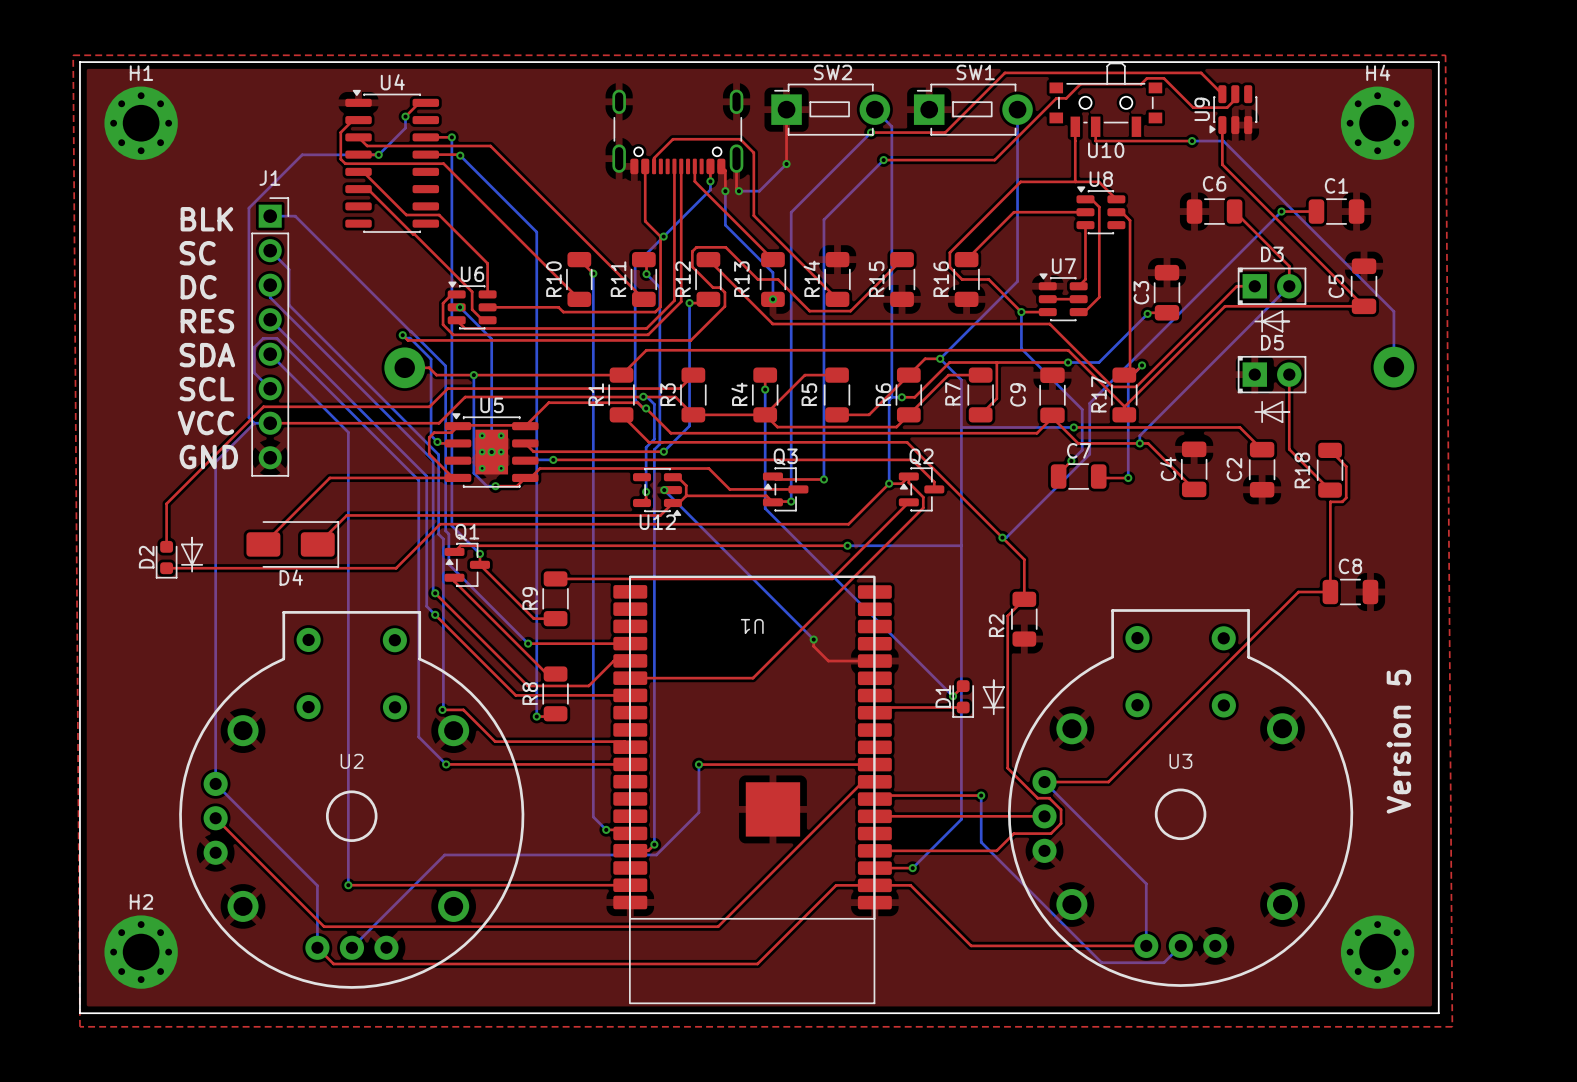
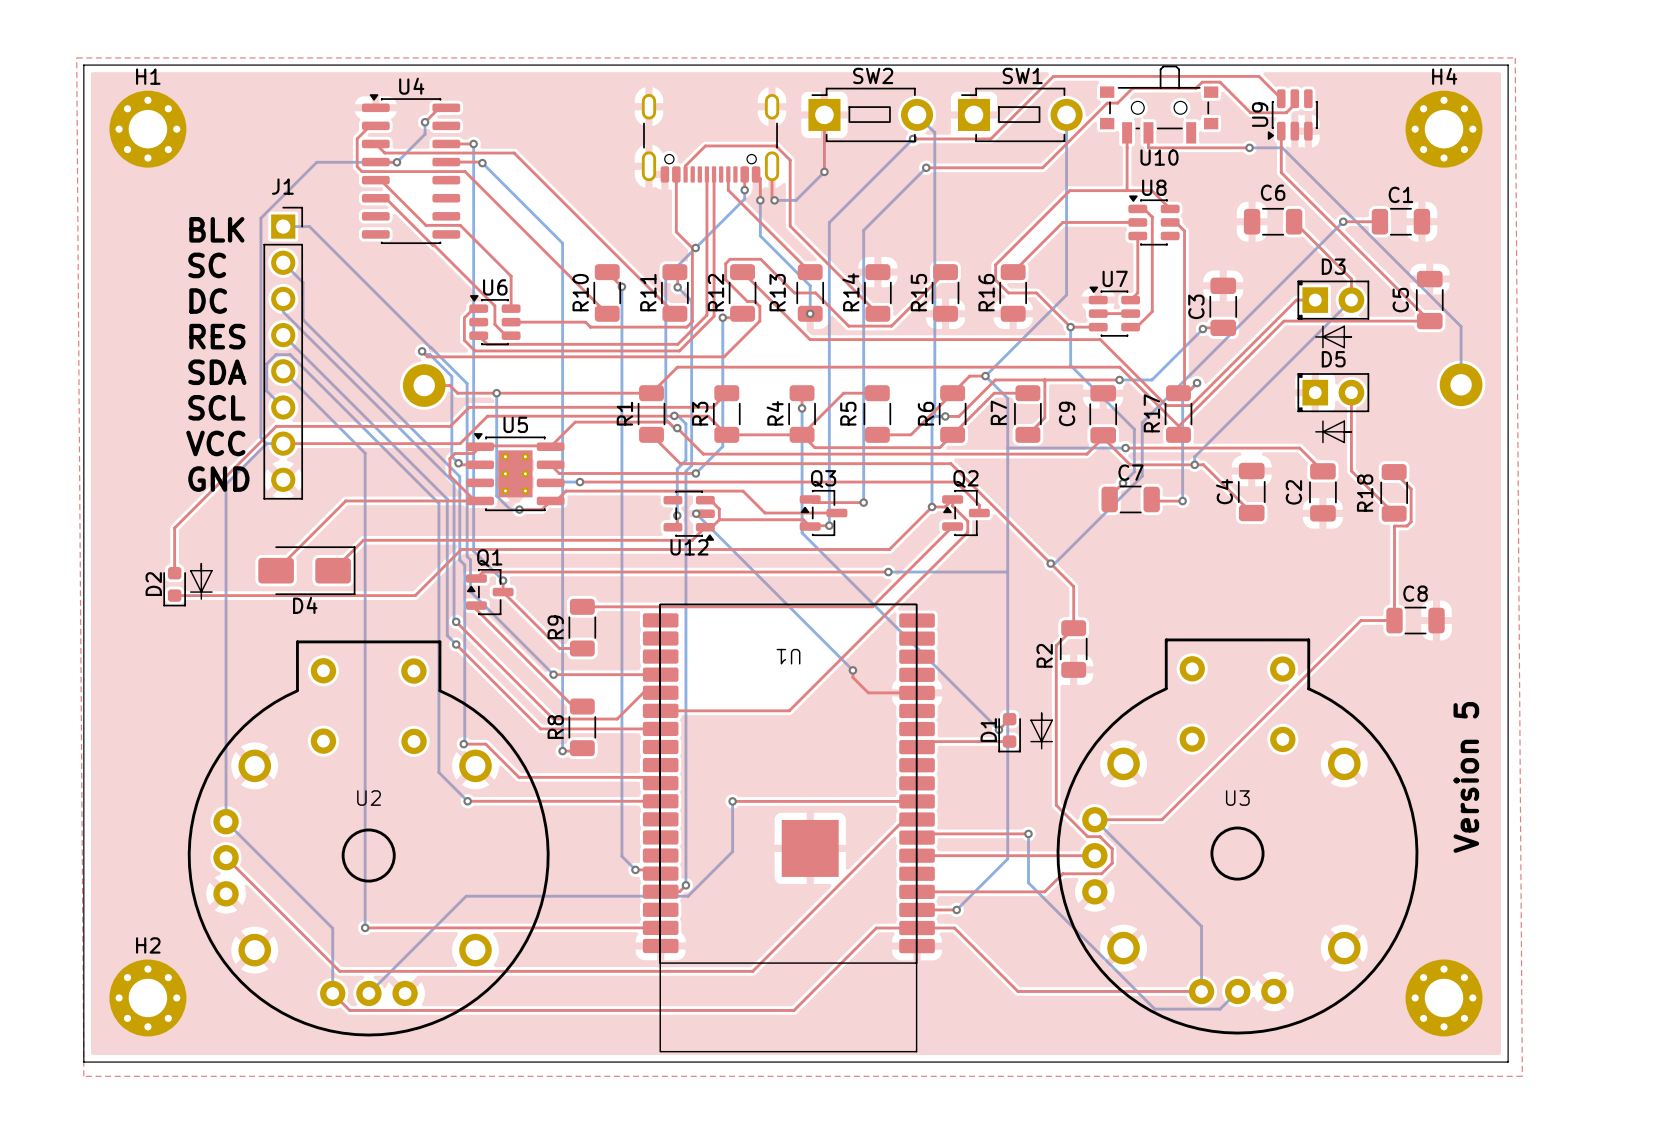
bottom track: (460, 307) (491, 339) (491, 452) -> none
via: (460, 307) -> none
via: (491, 452) -> none

